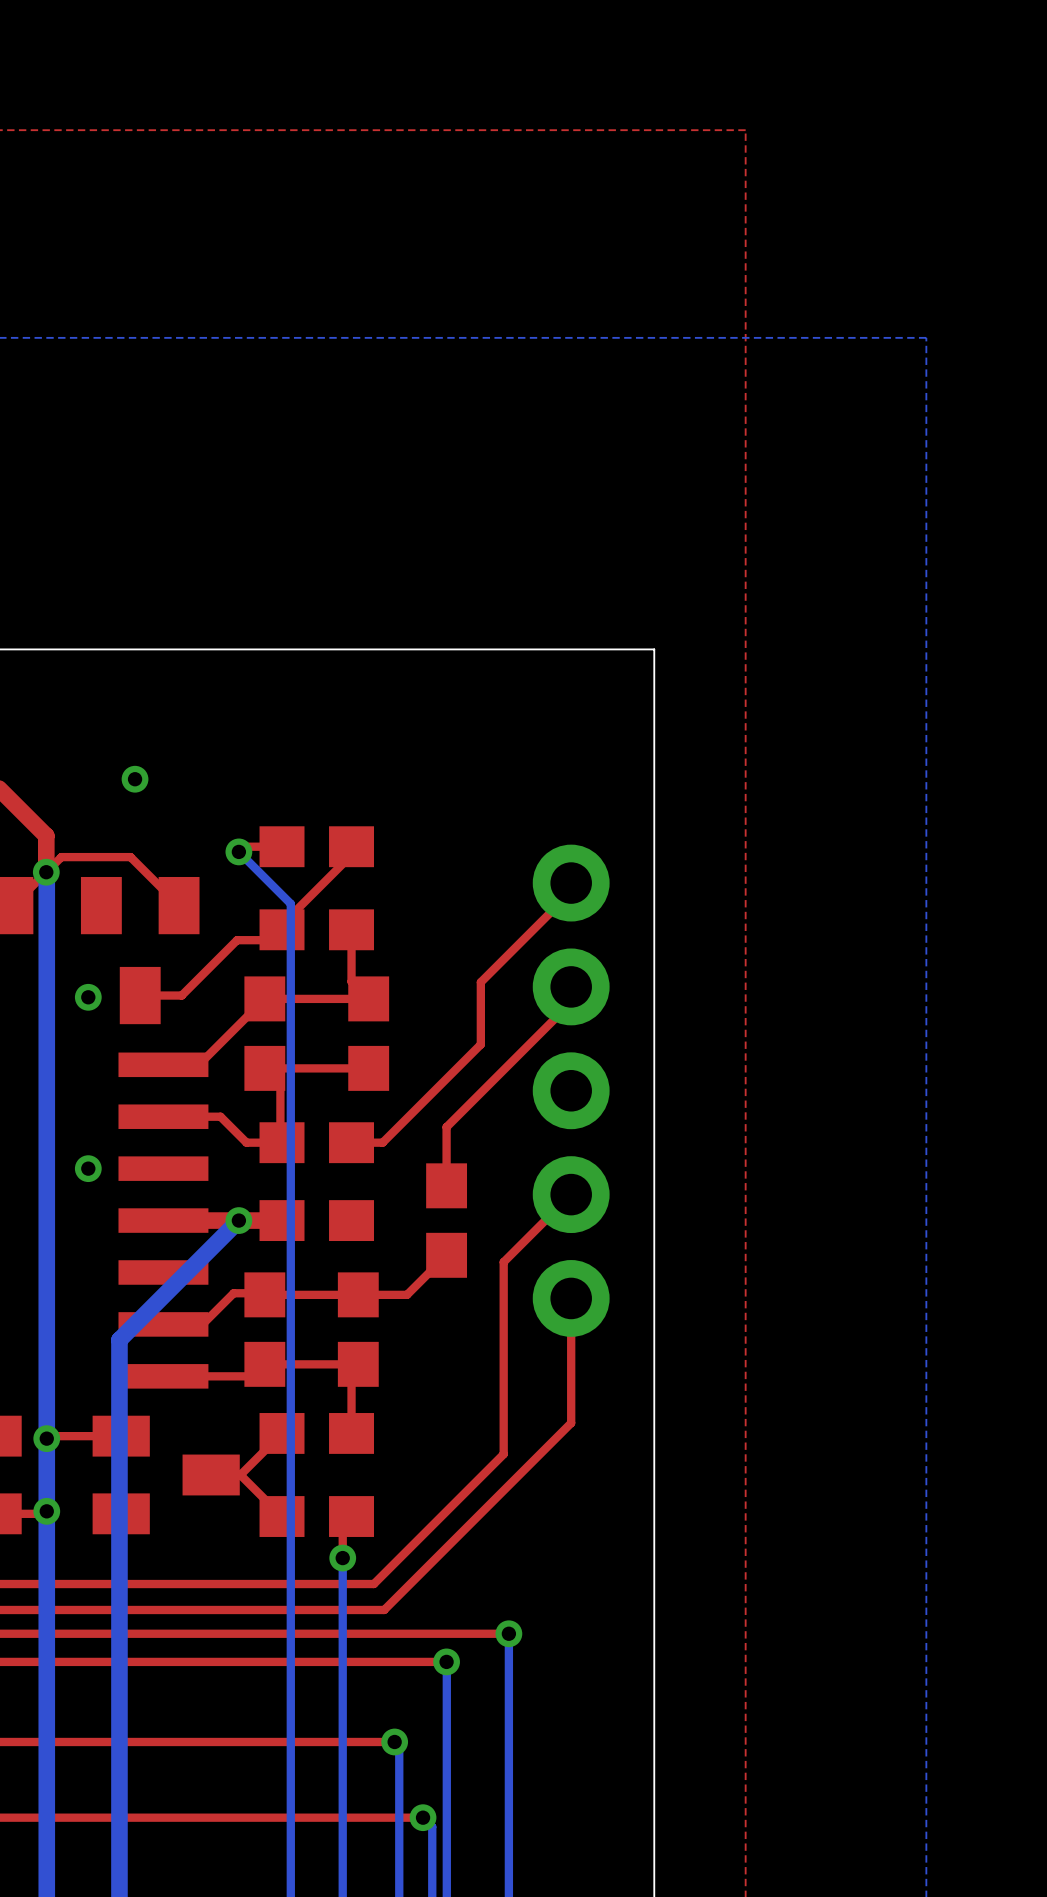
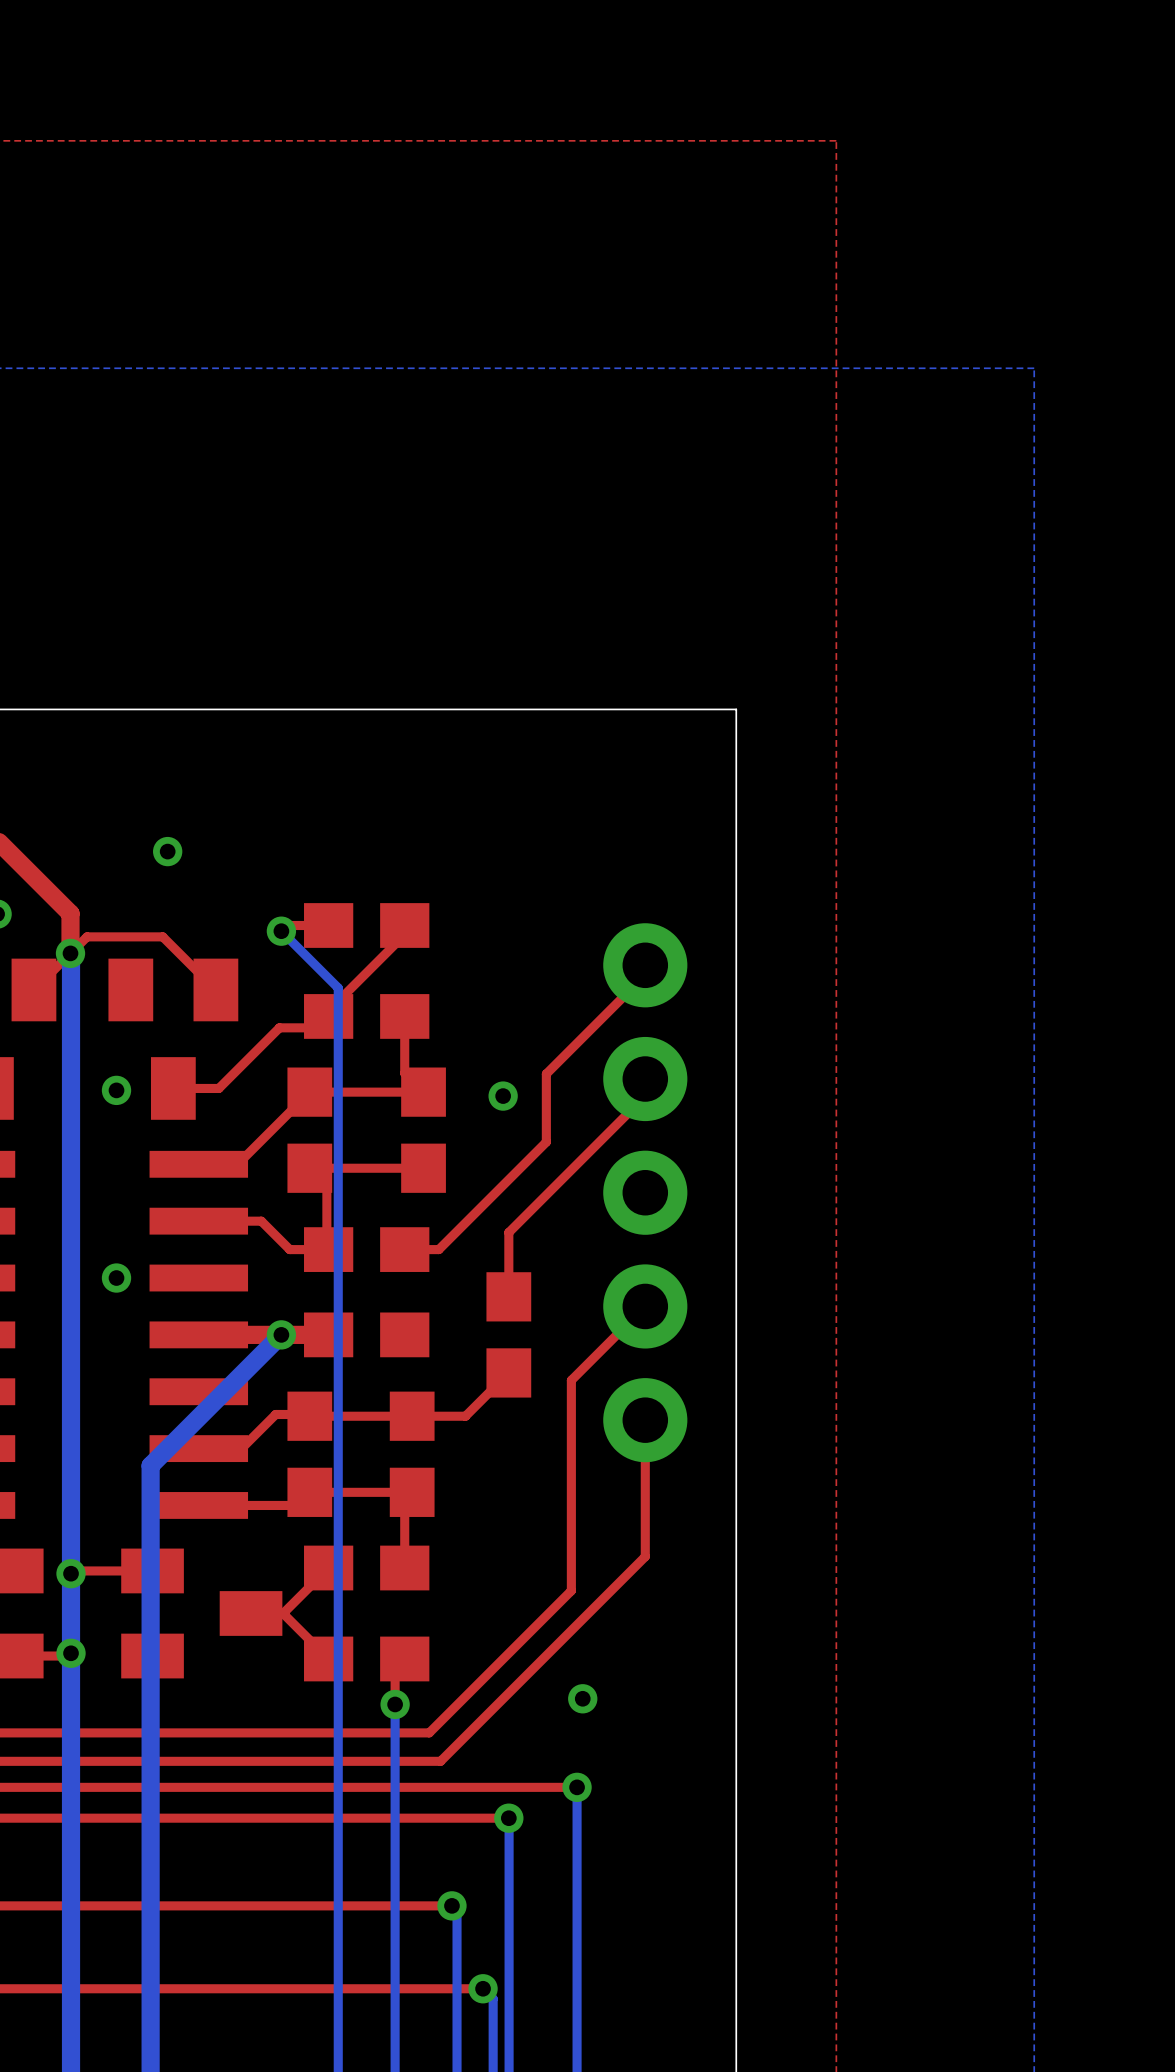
via: none -> (503, 1096)
via: none -> (582, 1698)

